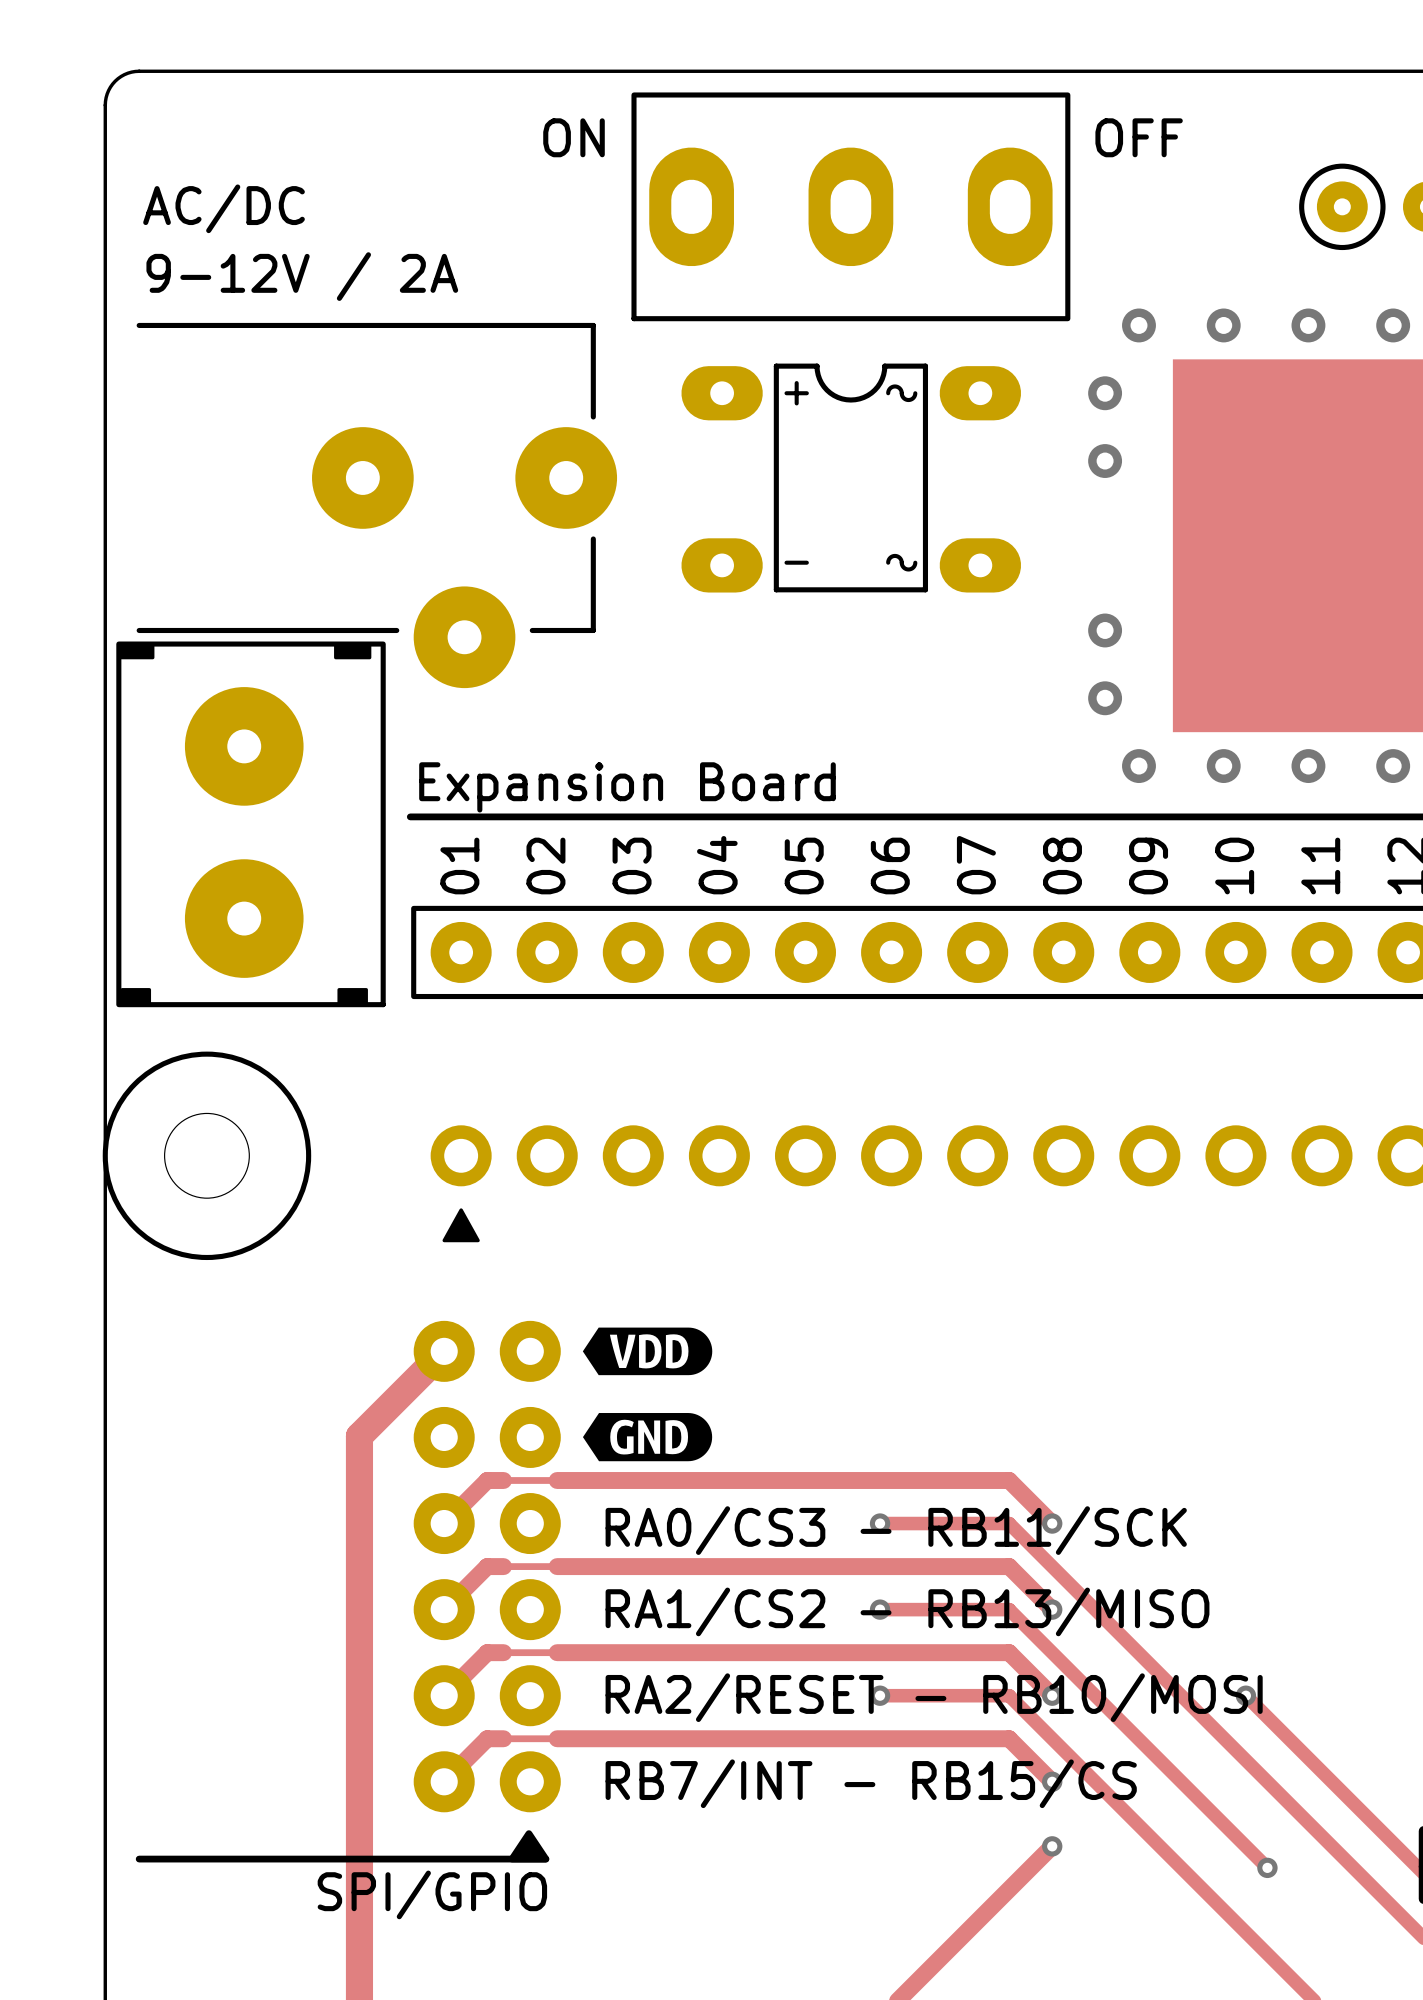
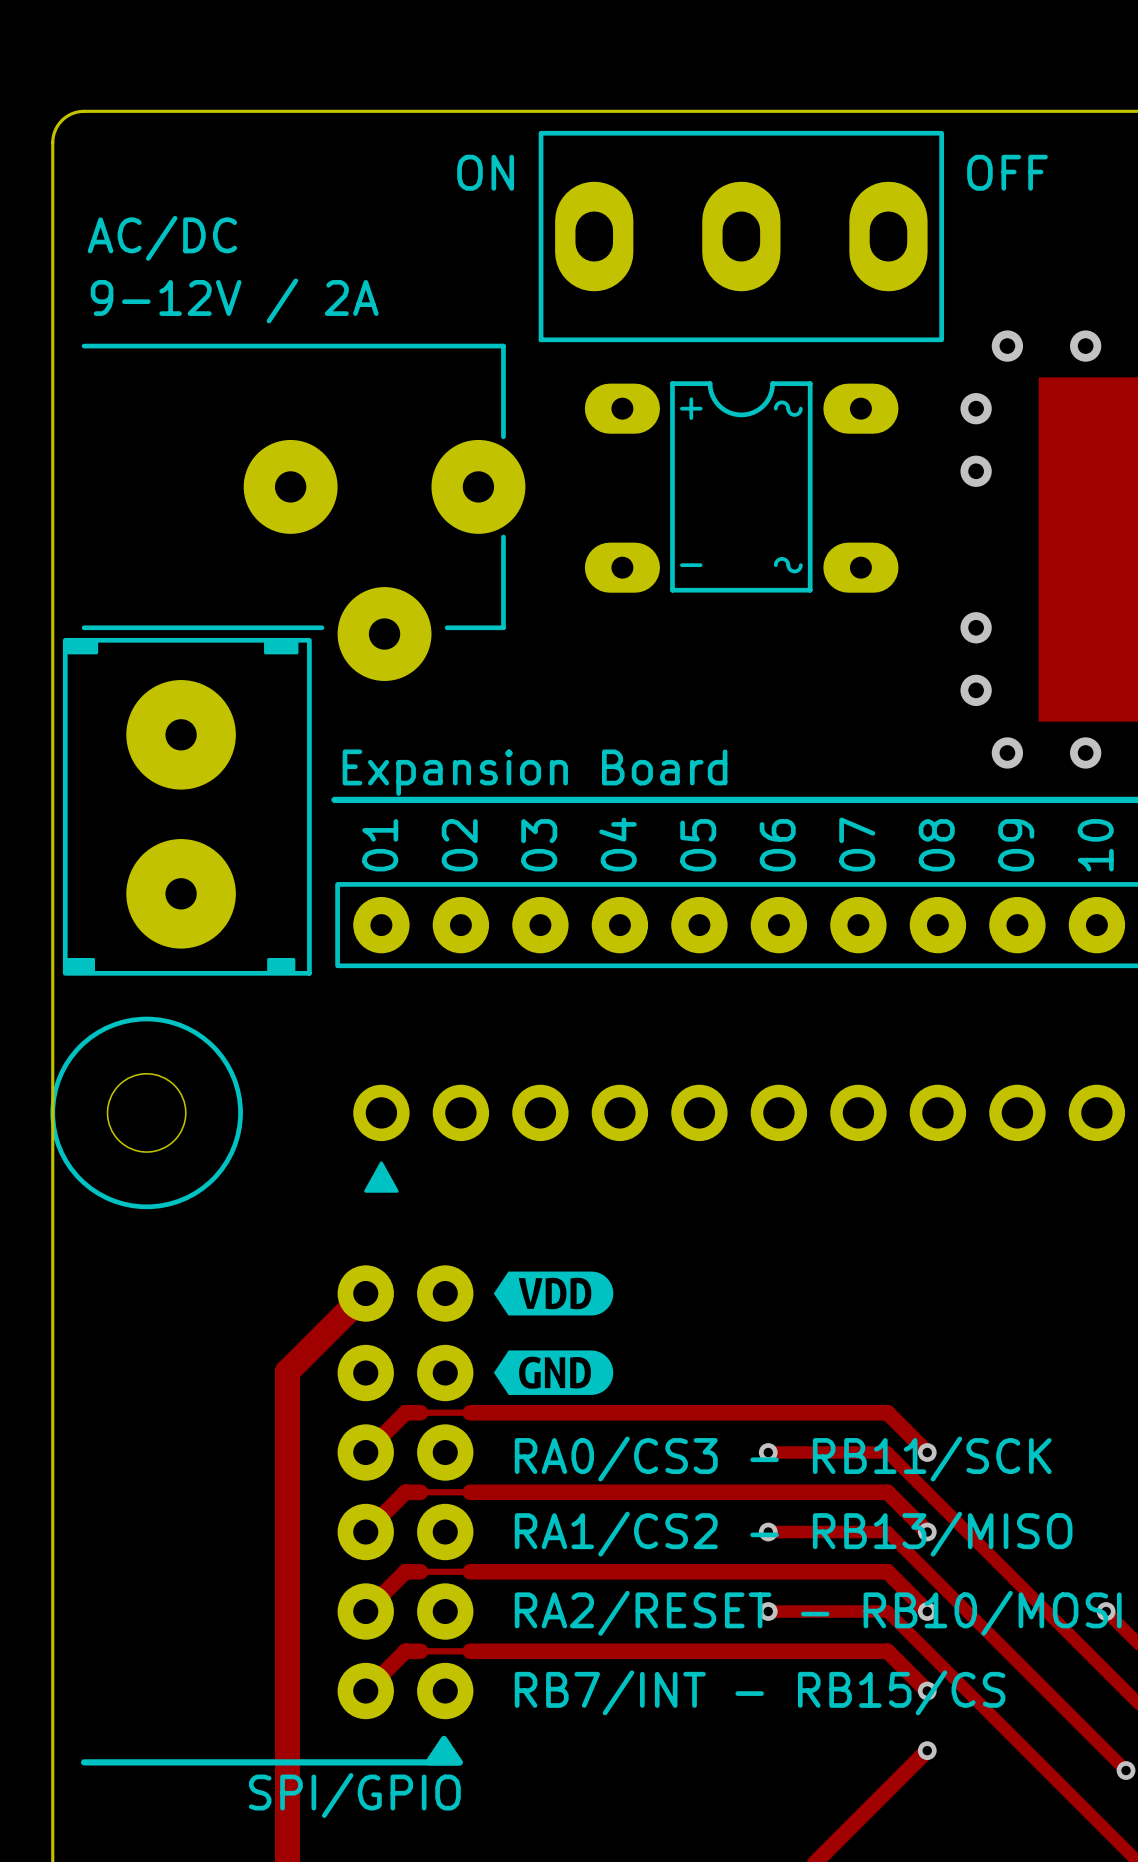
part footprint: [136, 322, 618, 689] -> [81, 343, 526, 681]

